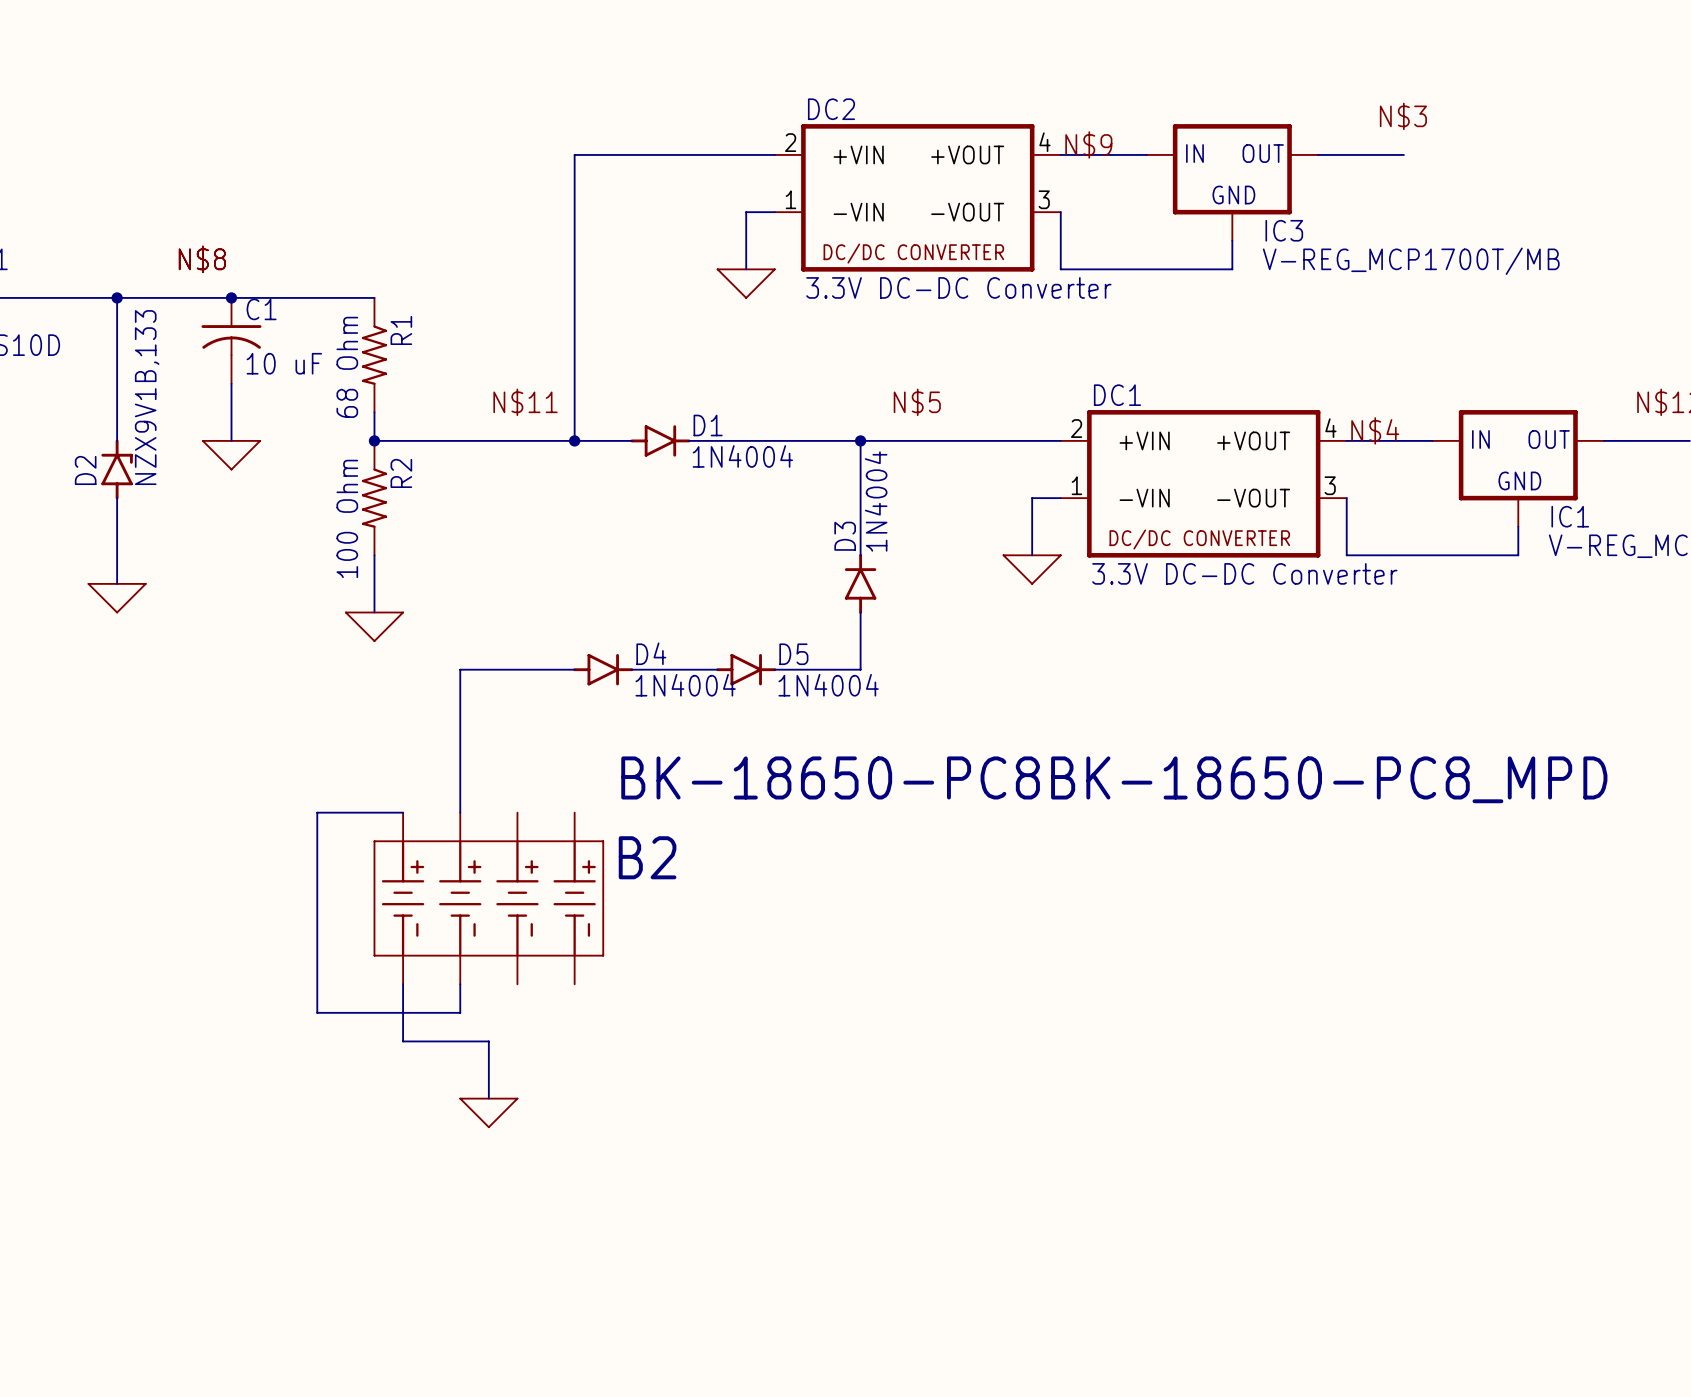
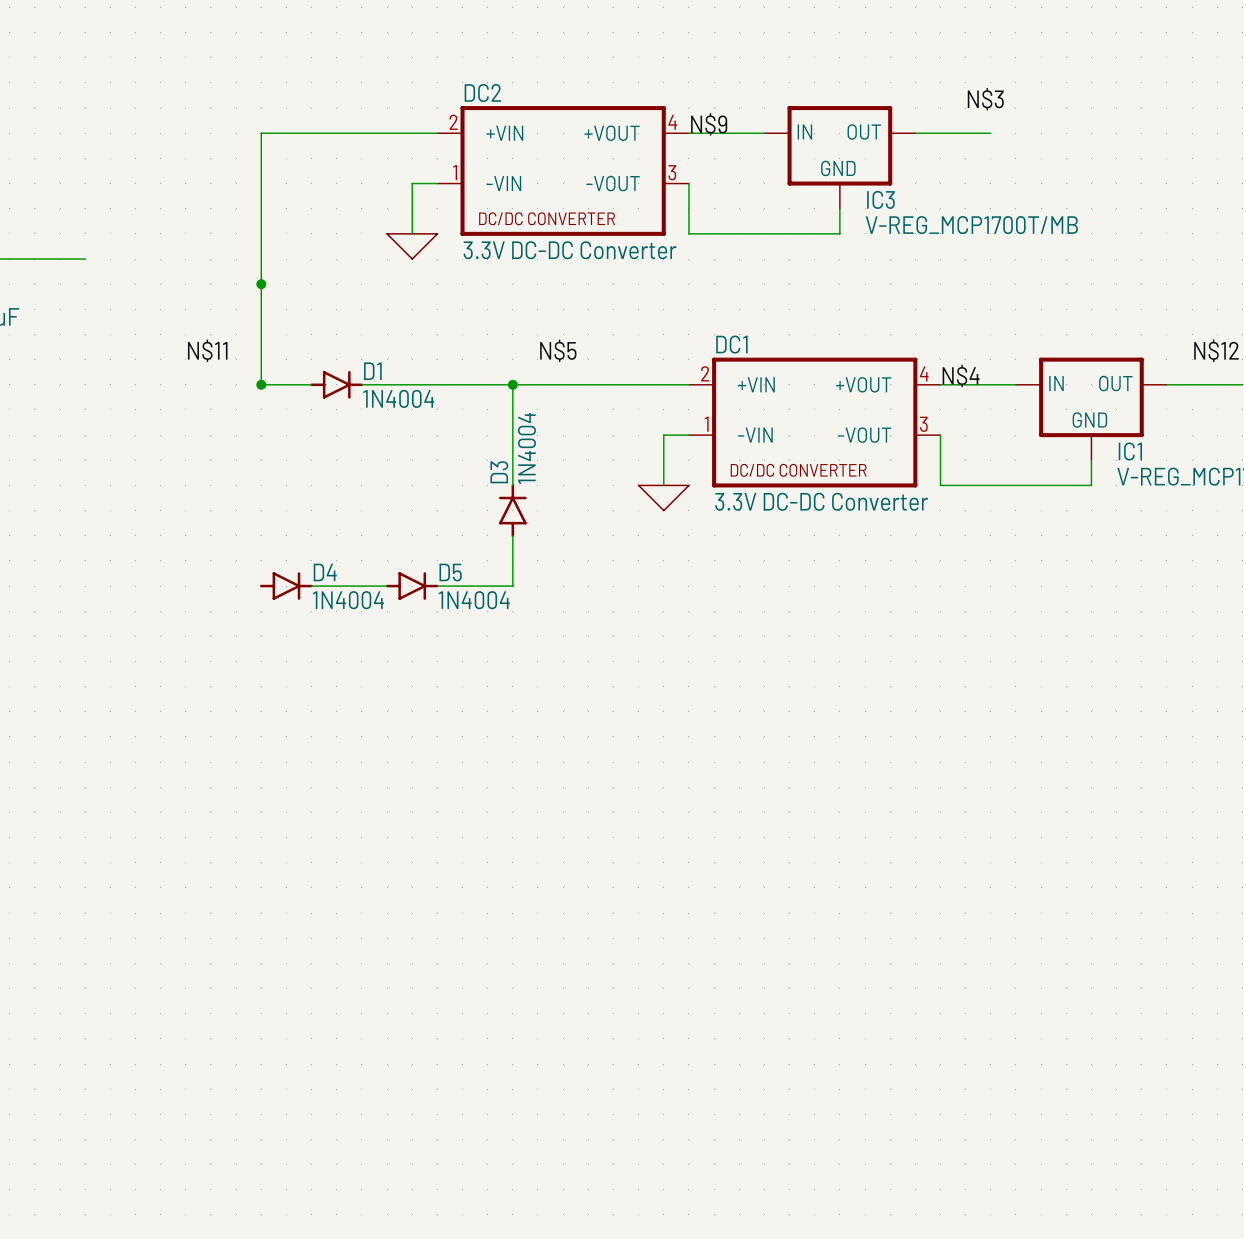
junction: none -> (261, 284)
R1: 68 Ohm (374, 355) -> none
wire: (374, 412) (374, 440) (574, 440) -> none
junction: (374, 440) -> none
R2: 100 Ohm (374, 498) -> none
wire: (374, 555) (374, 612) -> none
power symbol: (374, 626) -> none
wire: (574, 669) (460, 669) (460, 812) -> none
wire: (403, 812) (317, 812) (317, 1012) (460, 1012) (460, 984) -> none
B2: BK-18650-PC8BK-18650-PC8_MPD (488, 898) -> none
wire: (403, 984) (403, 1041) (488, 1041) (488, 1098) -> none
power symbol: (488, 1112) -> none

